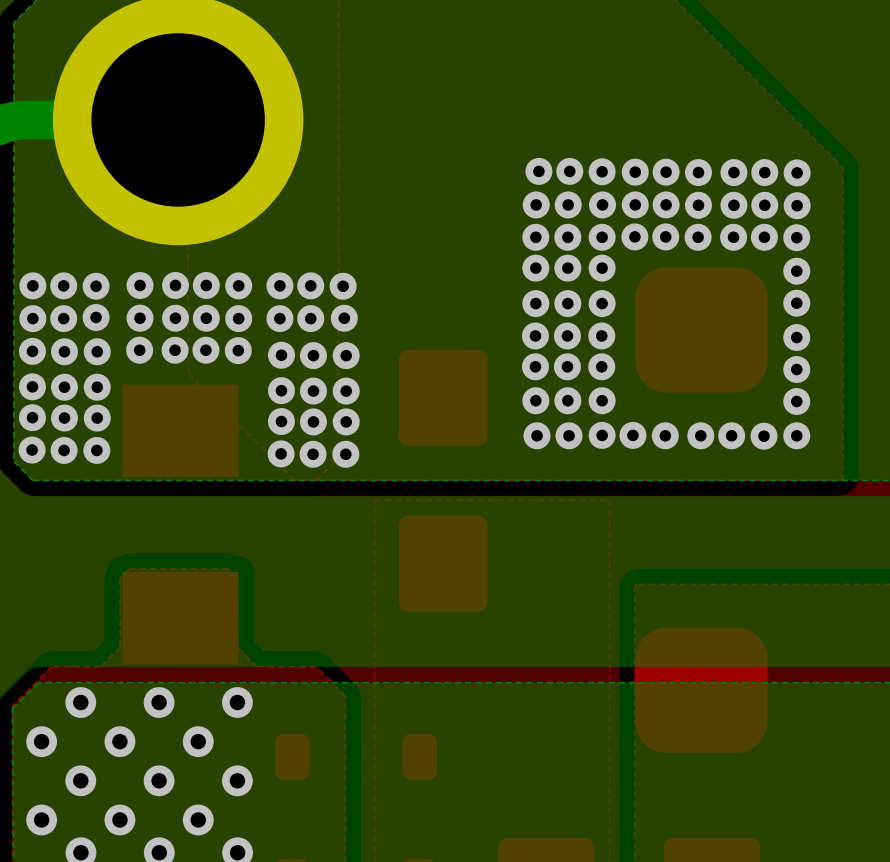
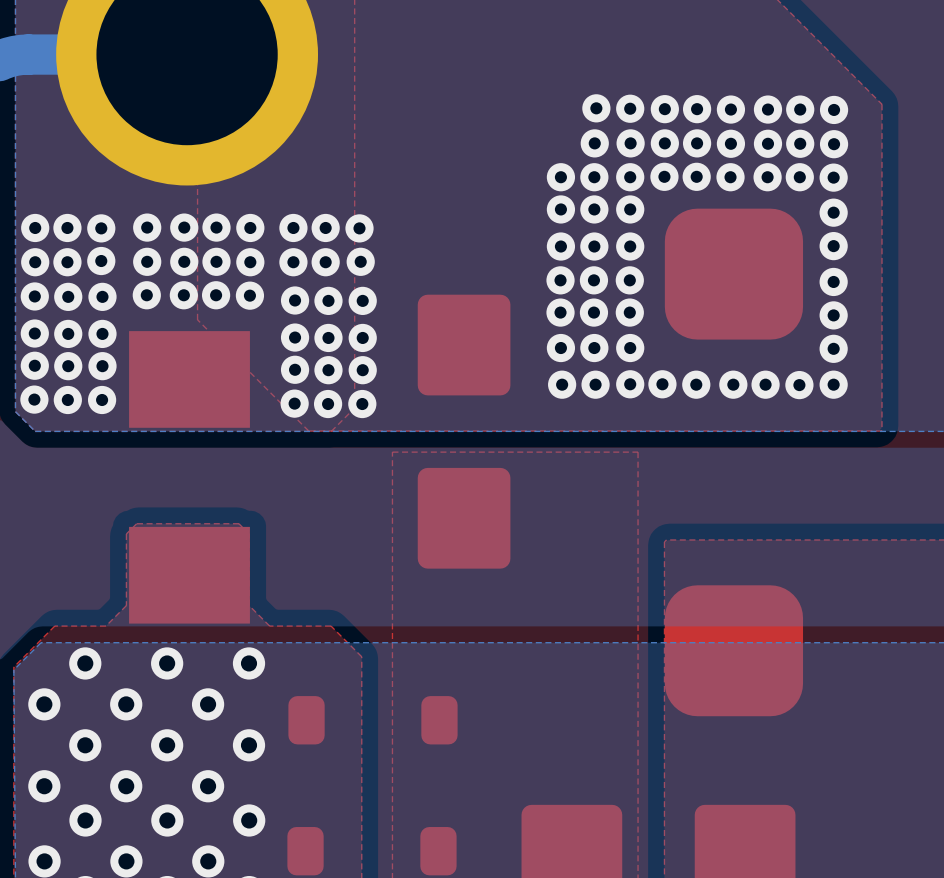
via: (538, 171) -> none
via: (536, 204) -> none

